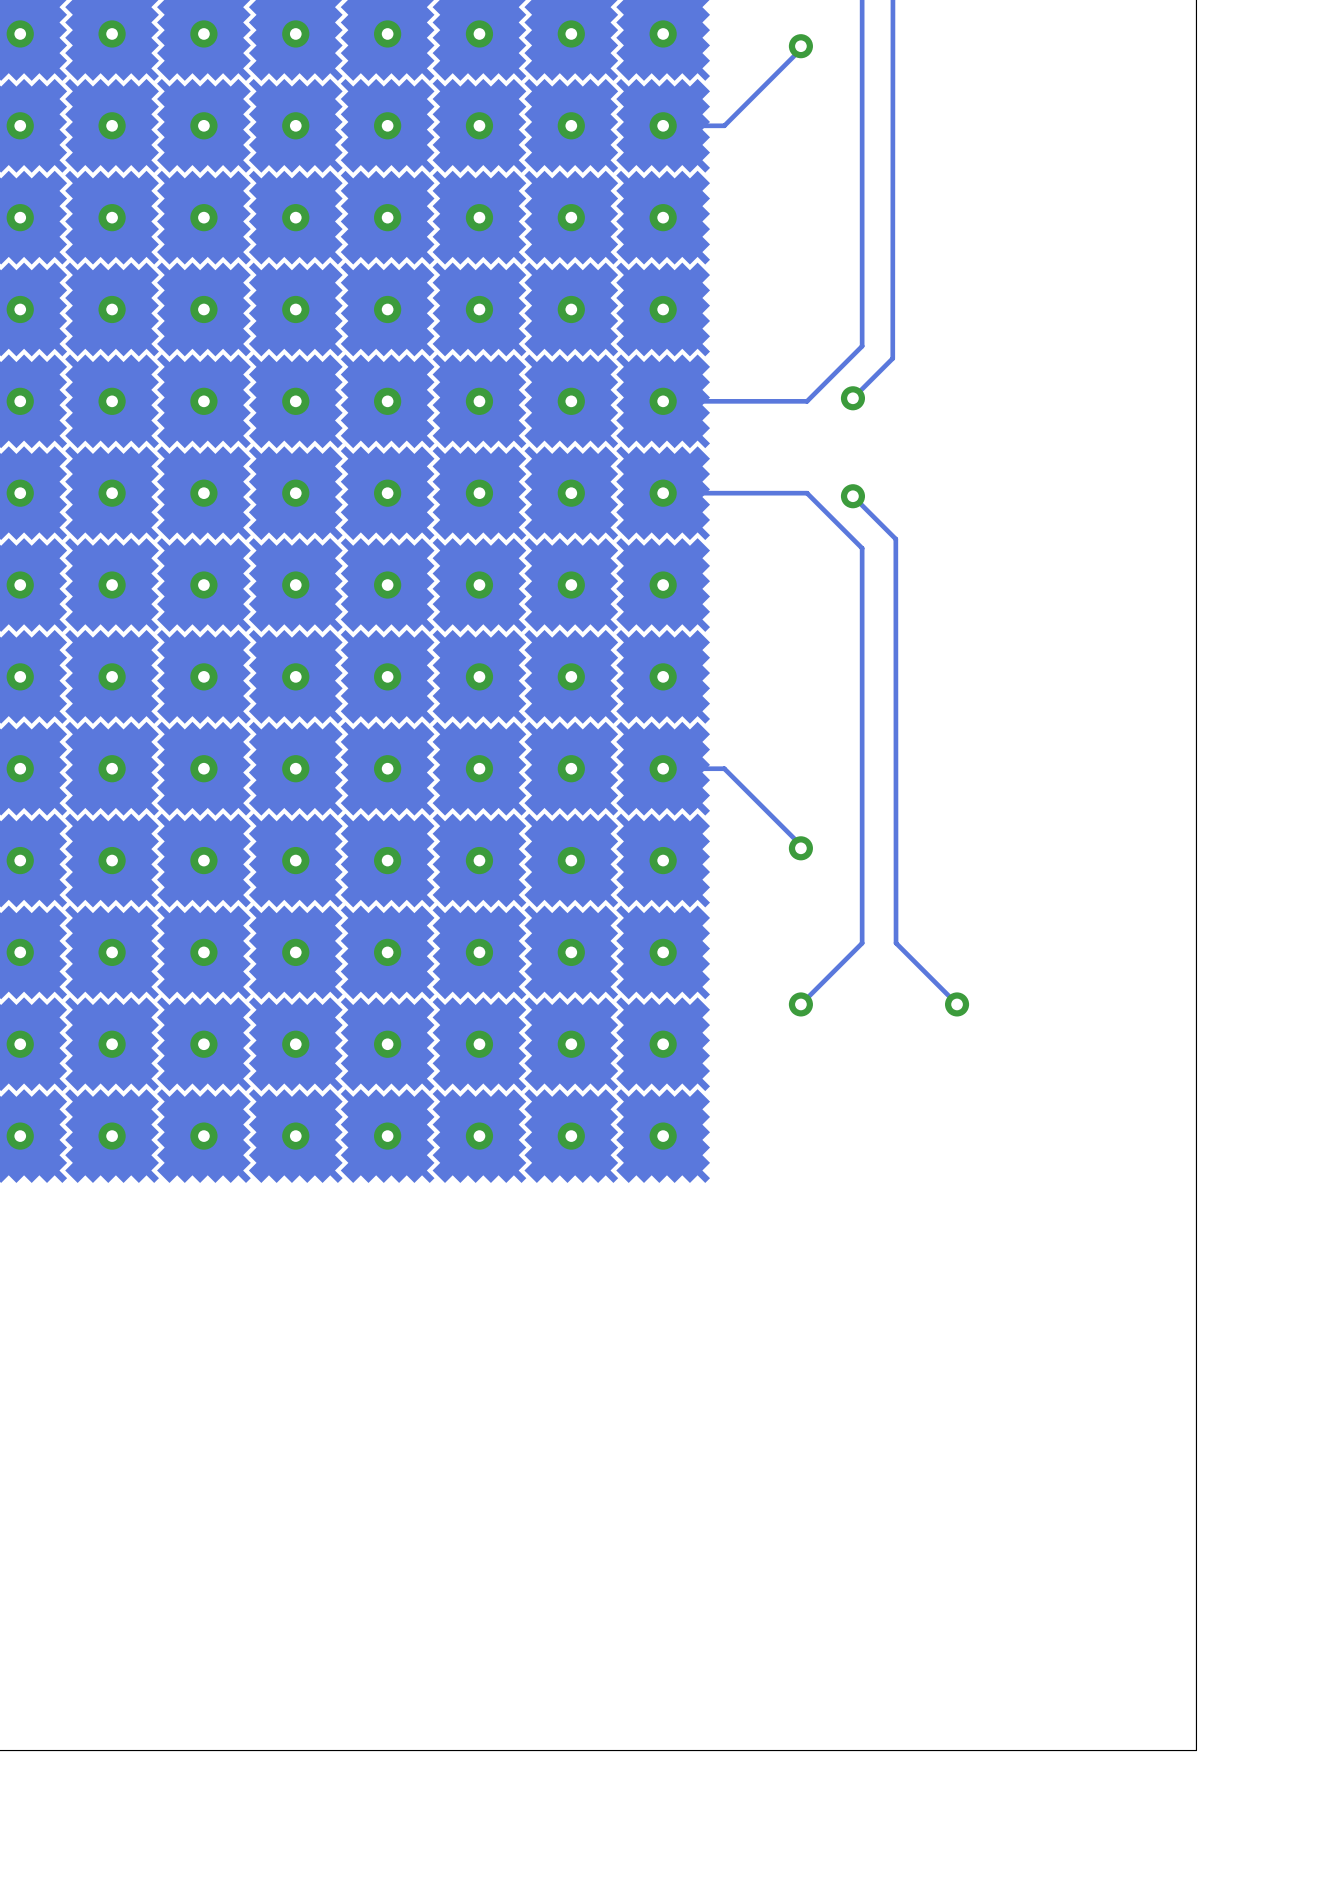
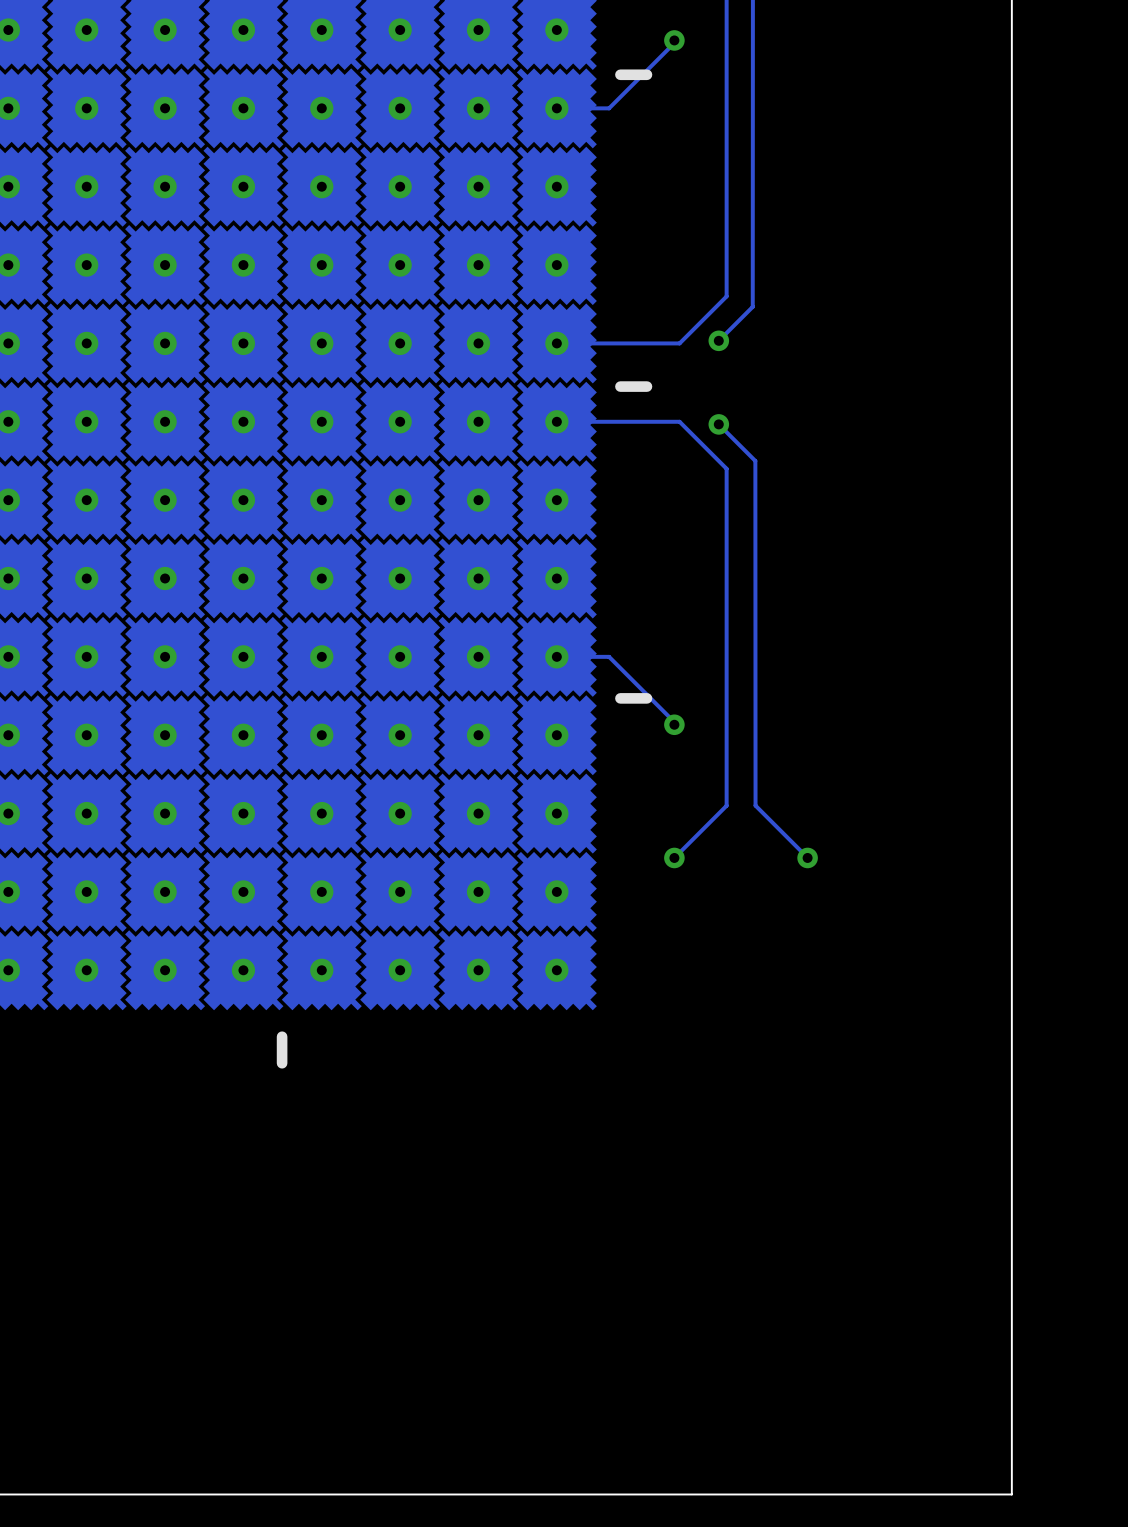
line: none -> (646, 74) (620, 74)
line: none -> (646, 386) (620, 386)
line: none -> (646, 698) (620, 698)
line: none -> (282, 1036) (282, 1063)

